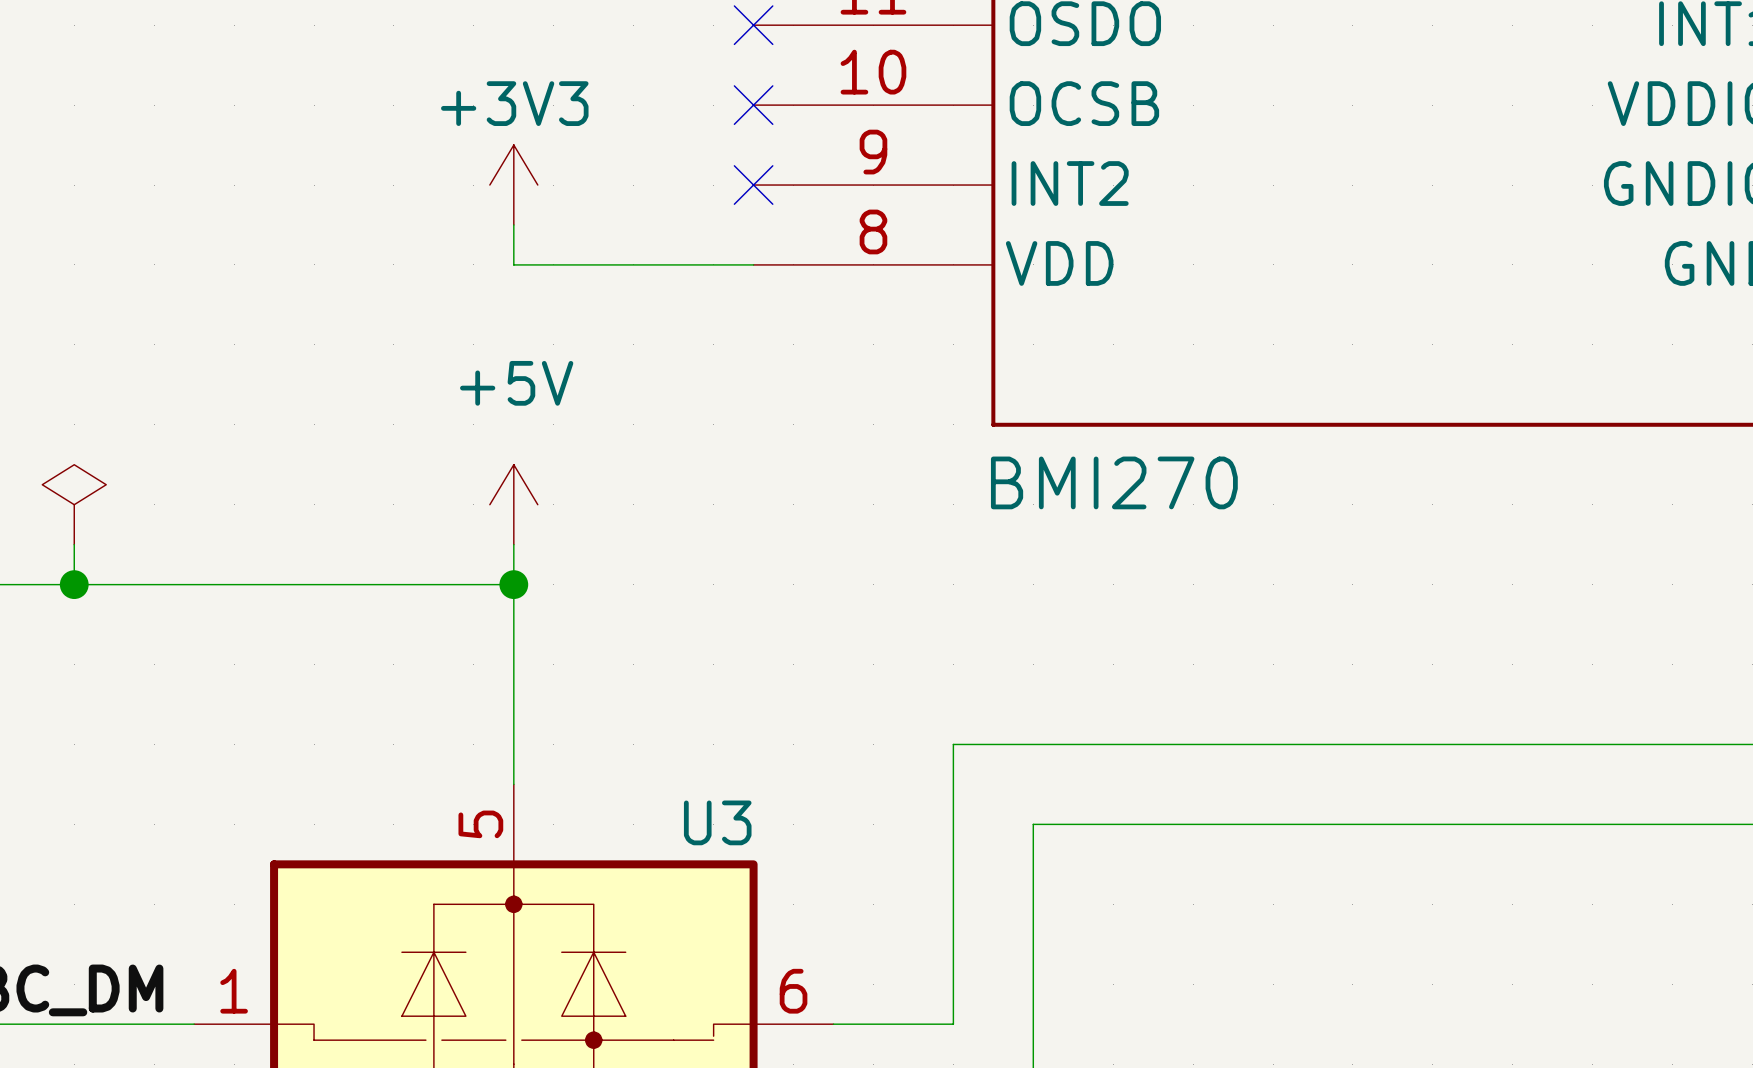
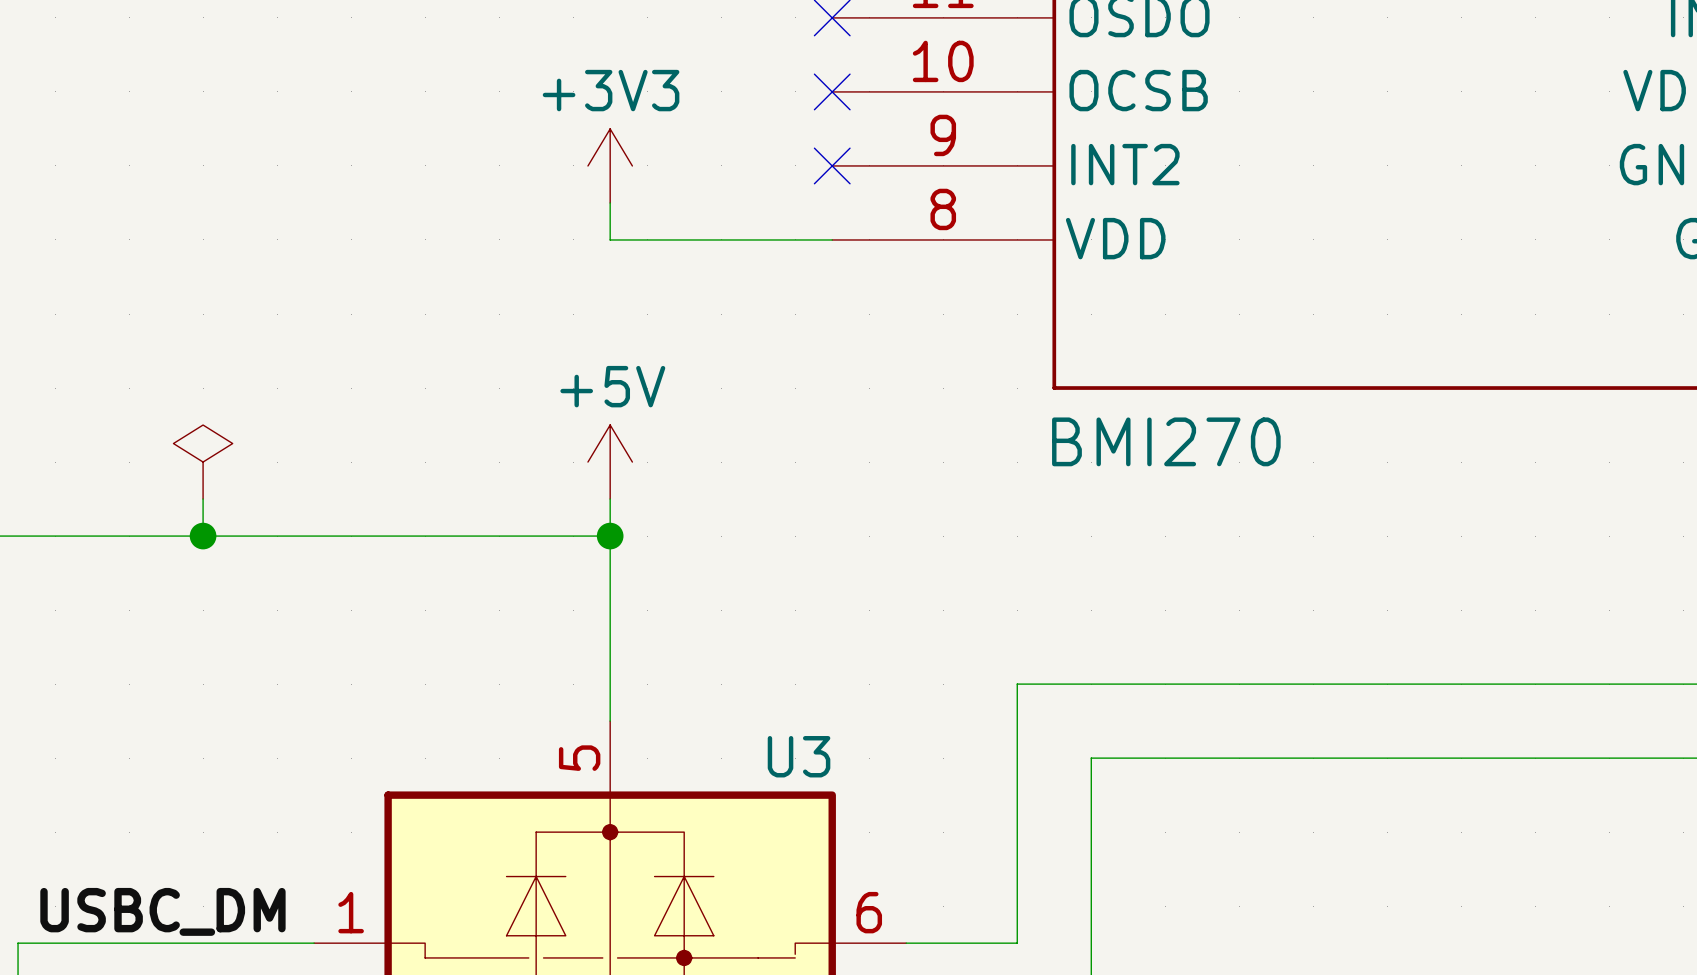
power symbol text position: +5V (516, 383) -> +5V (612, 386)

